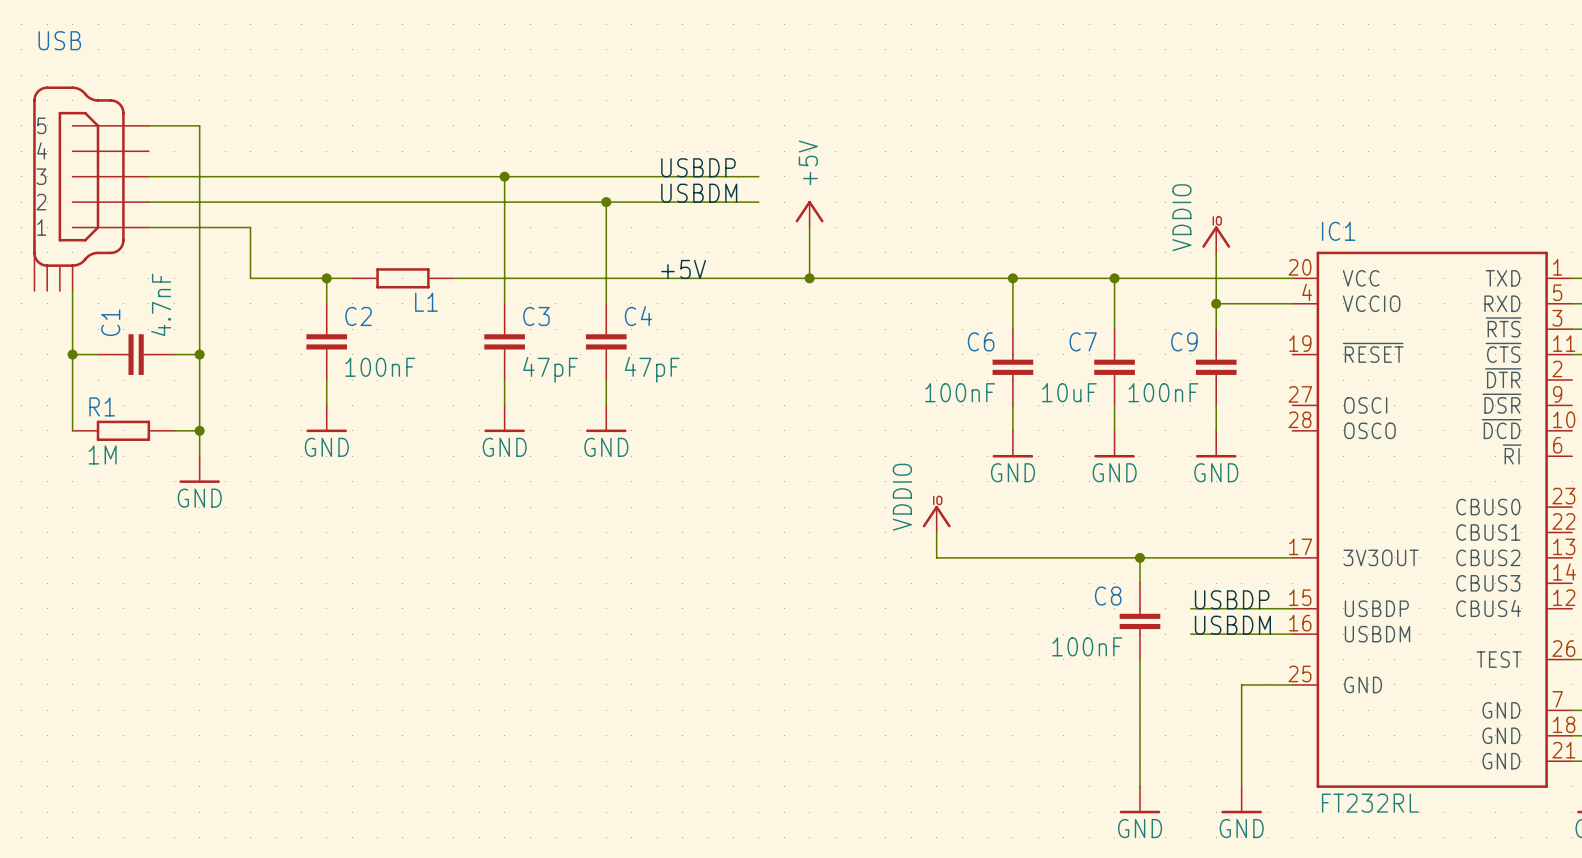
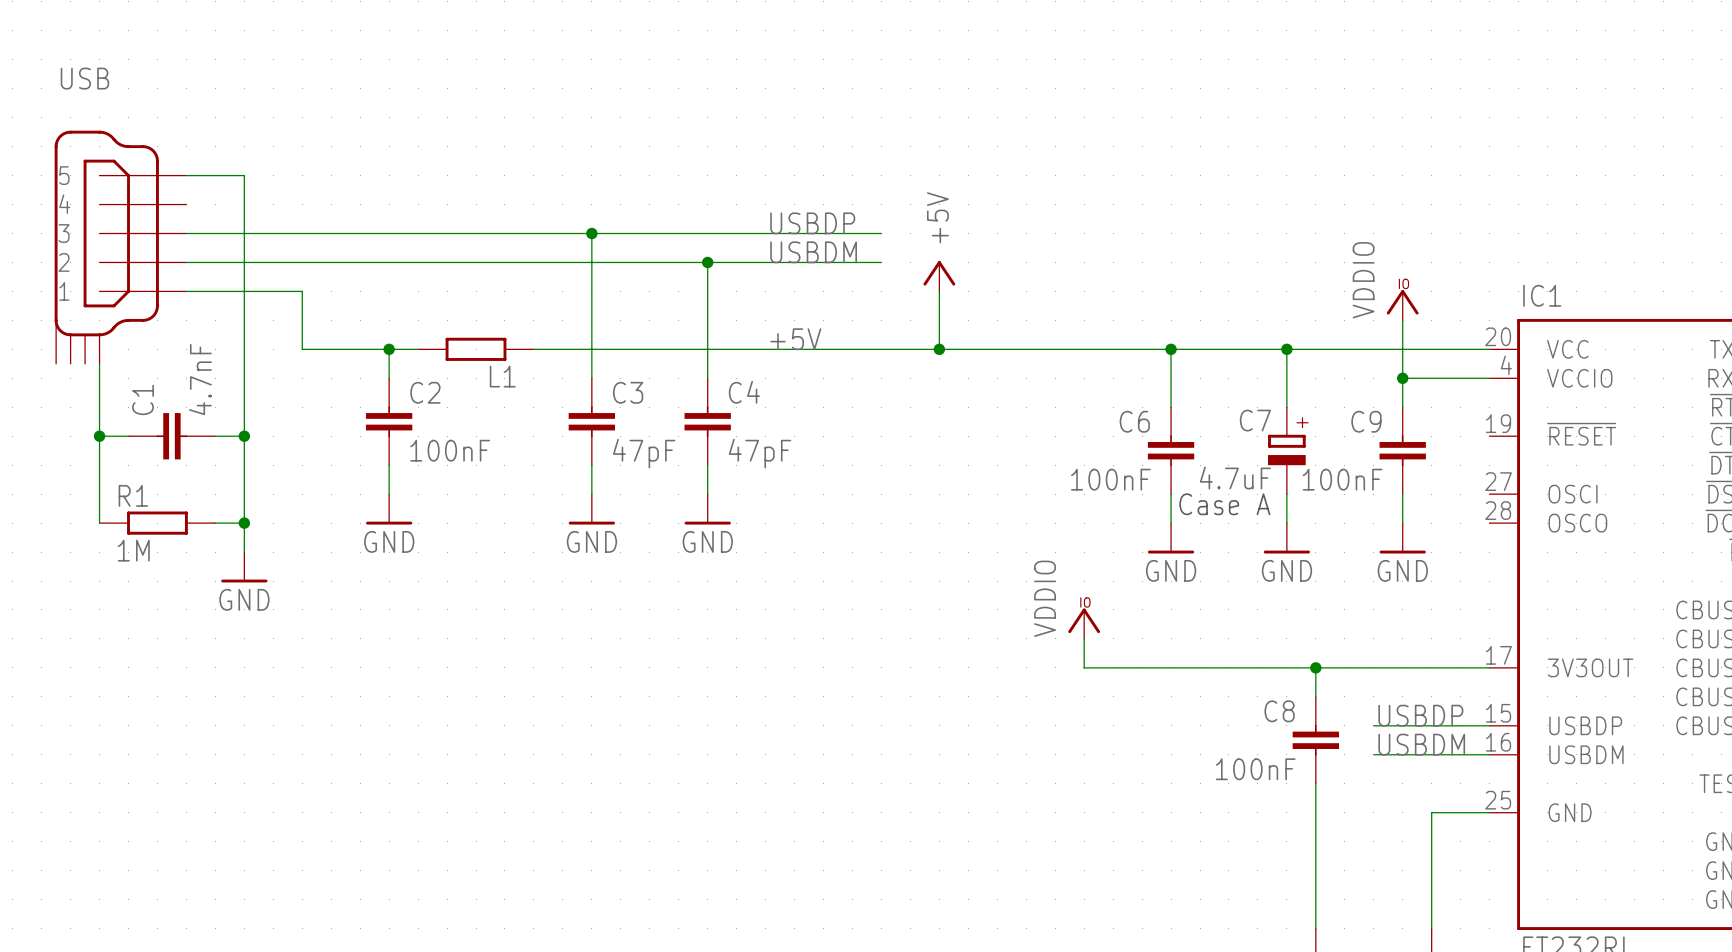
C7 symbol: [1094, 329, 1135, 406] -> [1268, 407, 1306, 495]
C7 value: 10uF (1069, 392) -> 4.7uF (1235, 478)
text: none -> Case A (1224, 504)

